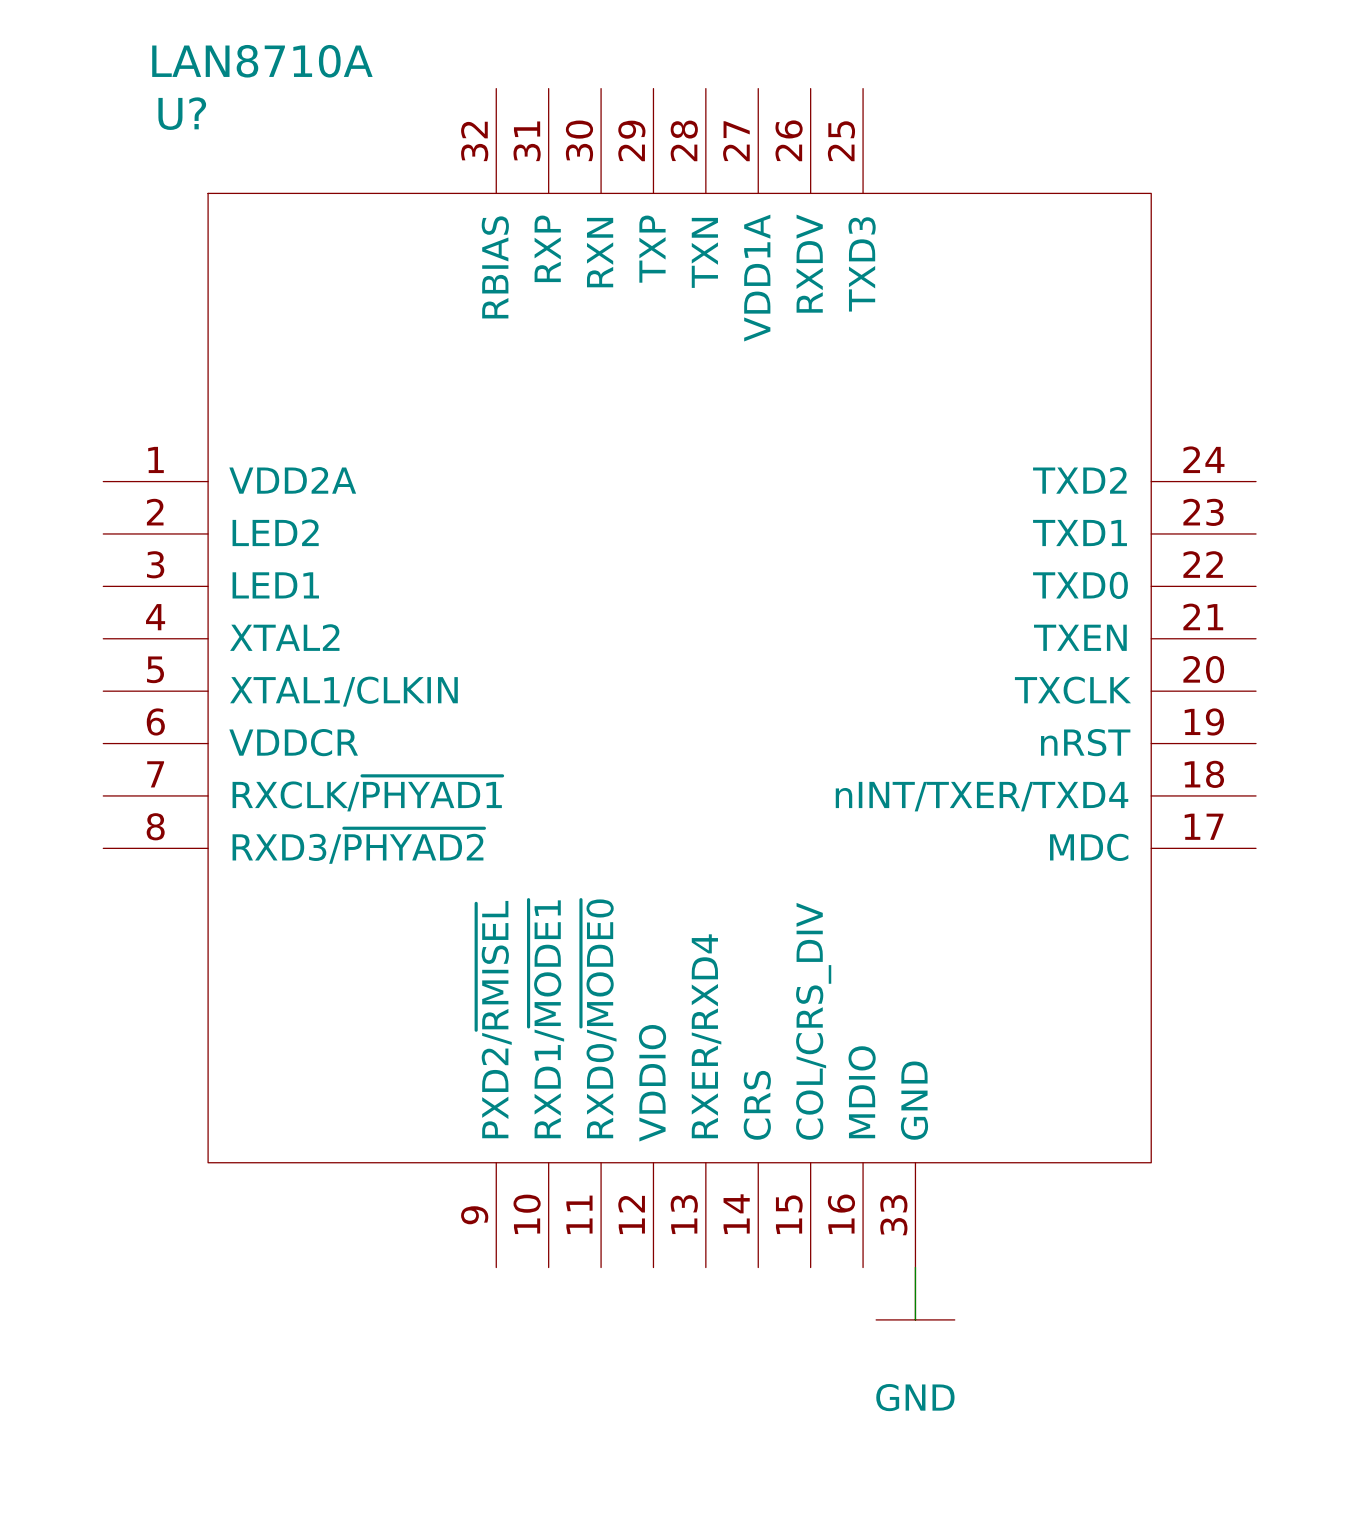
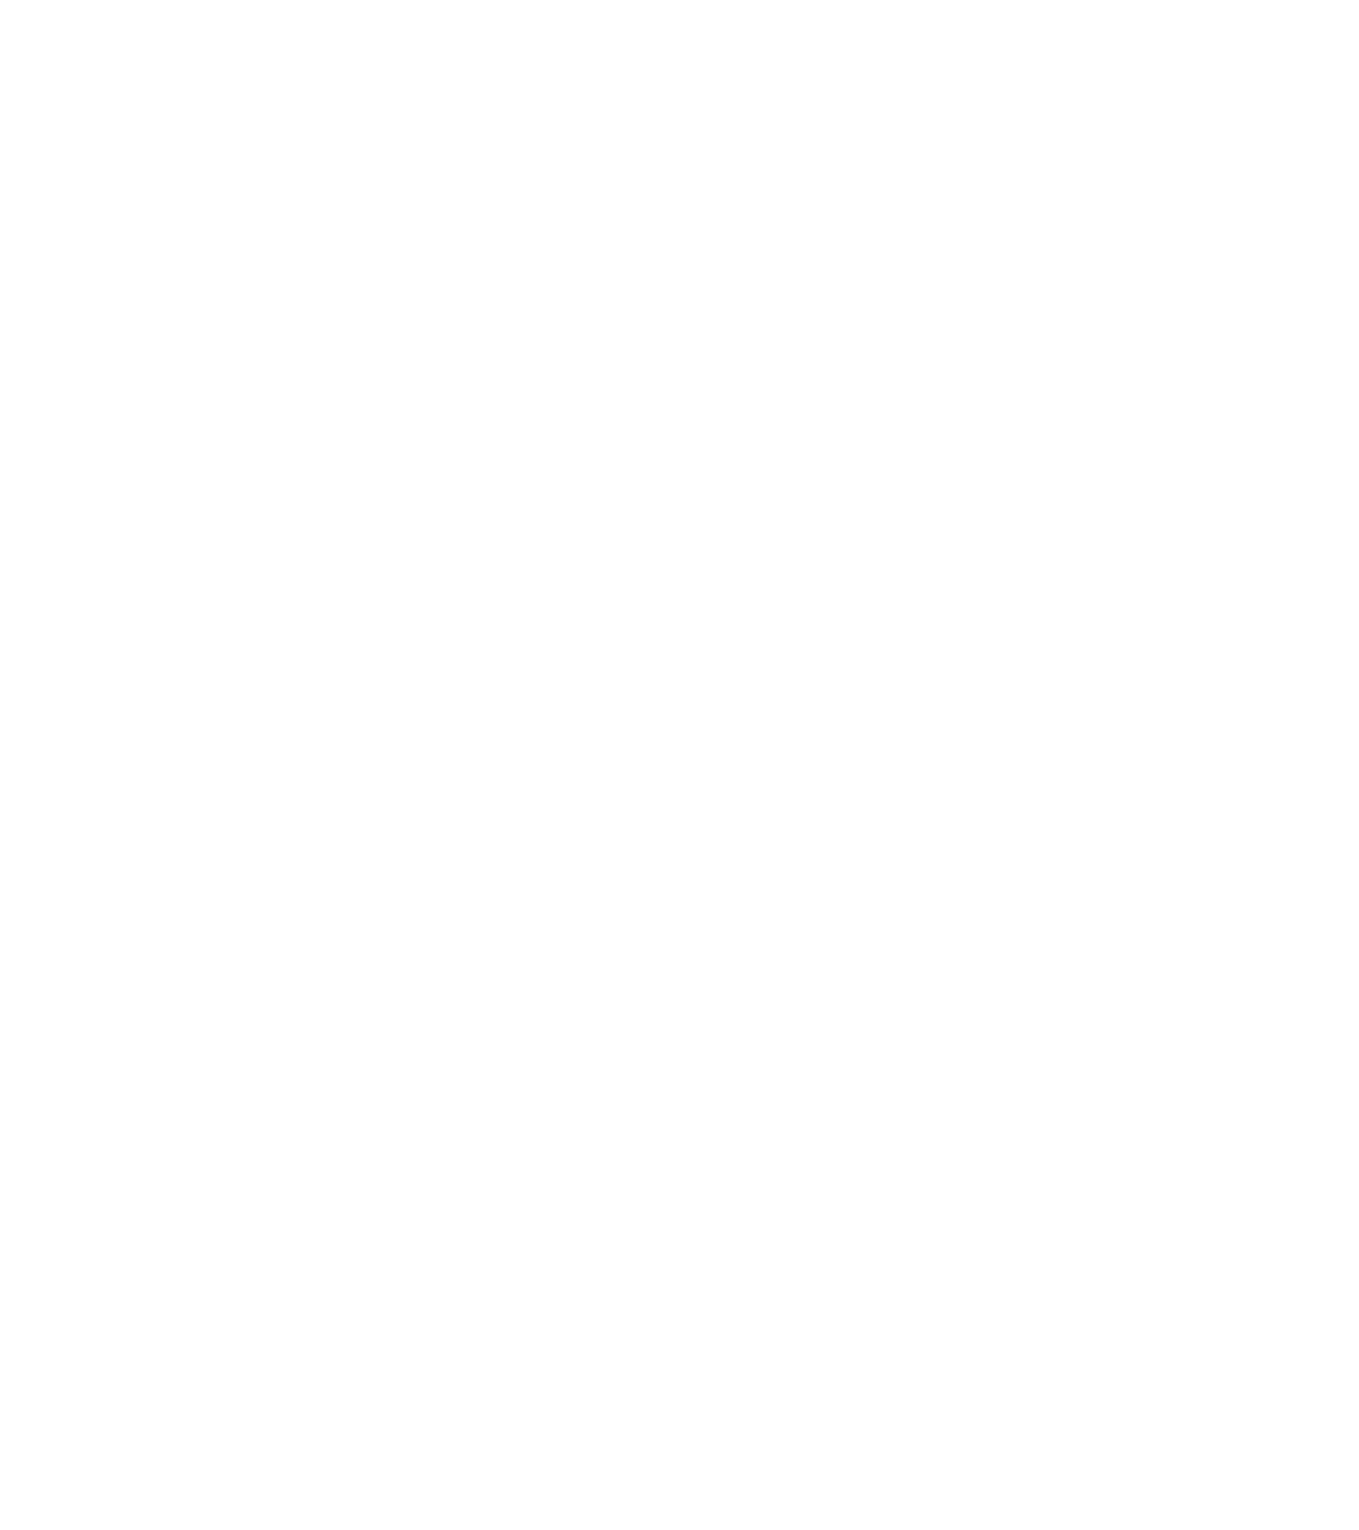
U?: LAN8710A (679, 678) -> none
wire: (915, 1267) (915, 1319) -> none
power symbol: GND (915, 1293) -> none

